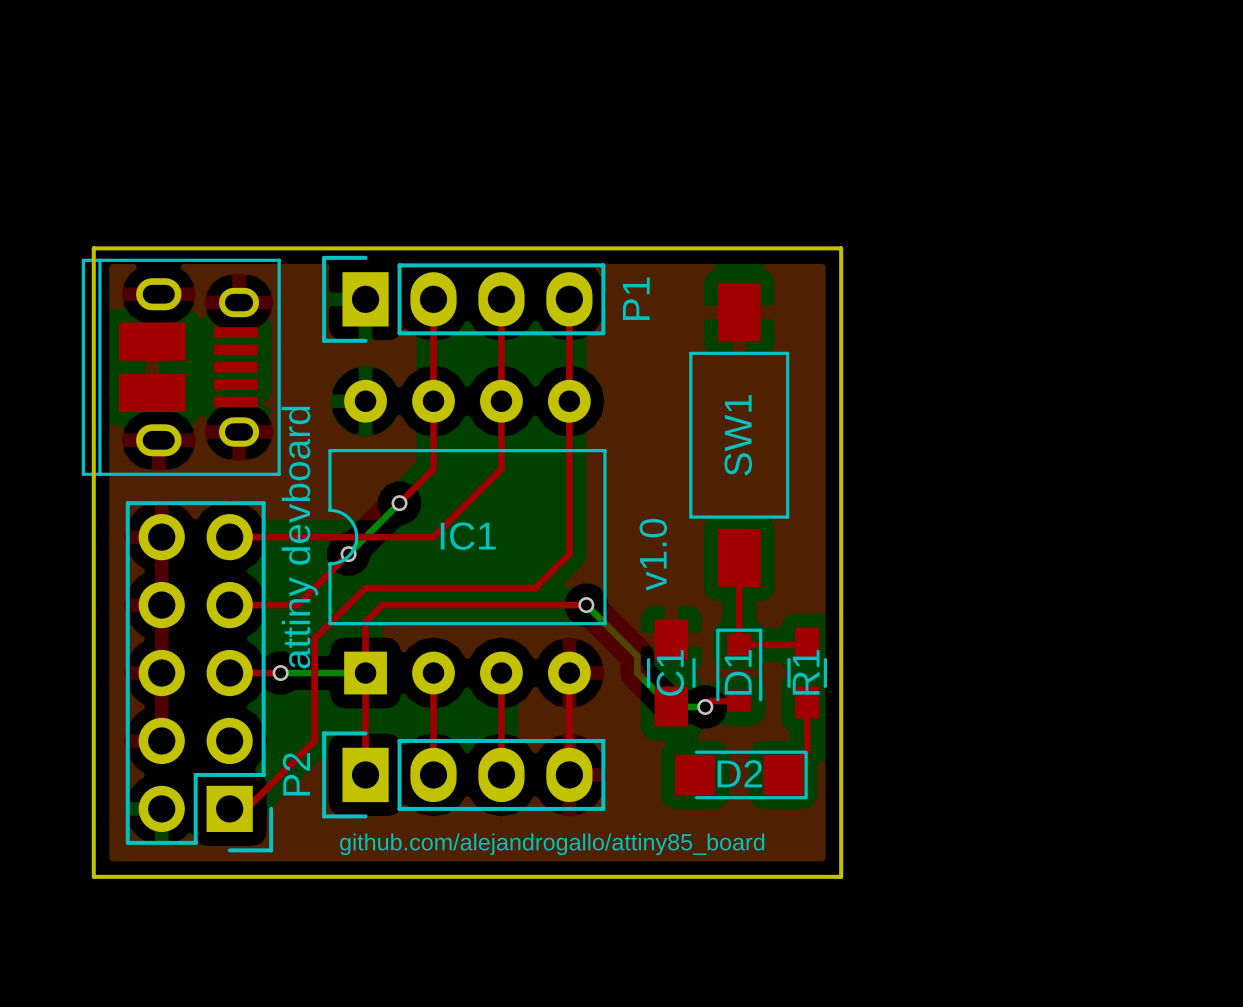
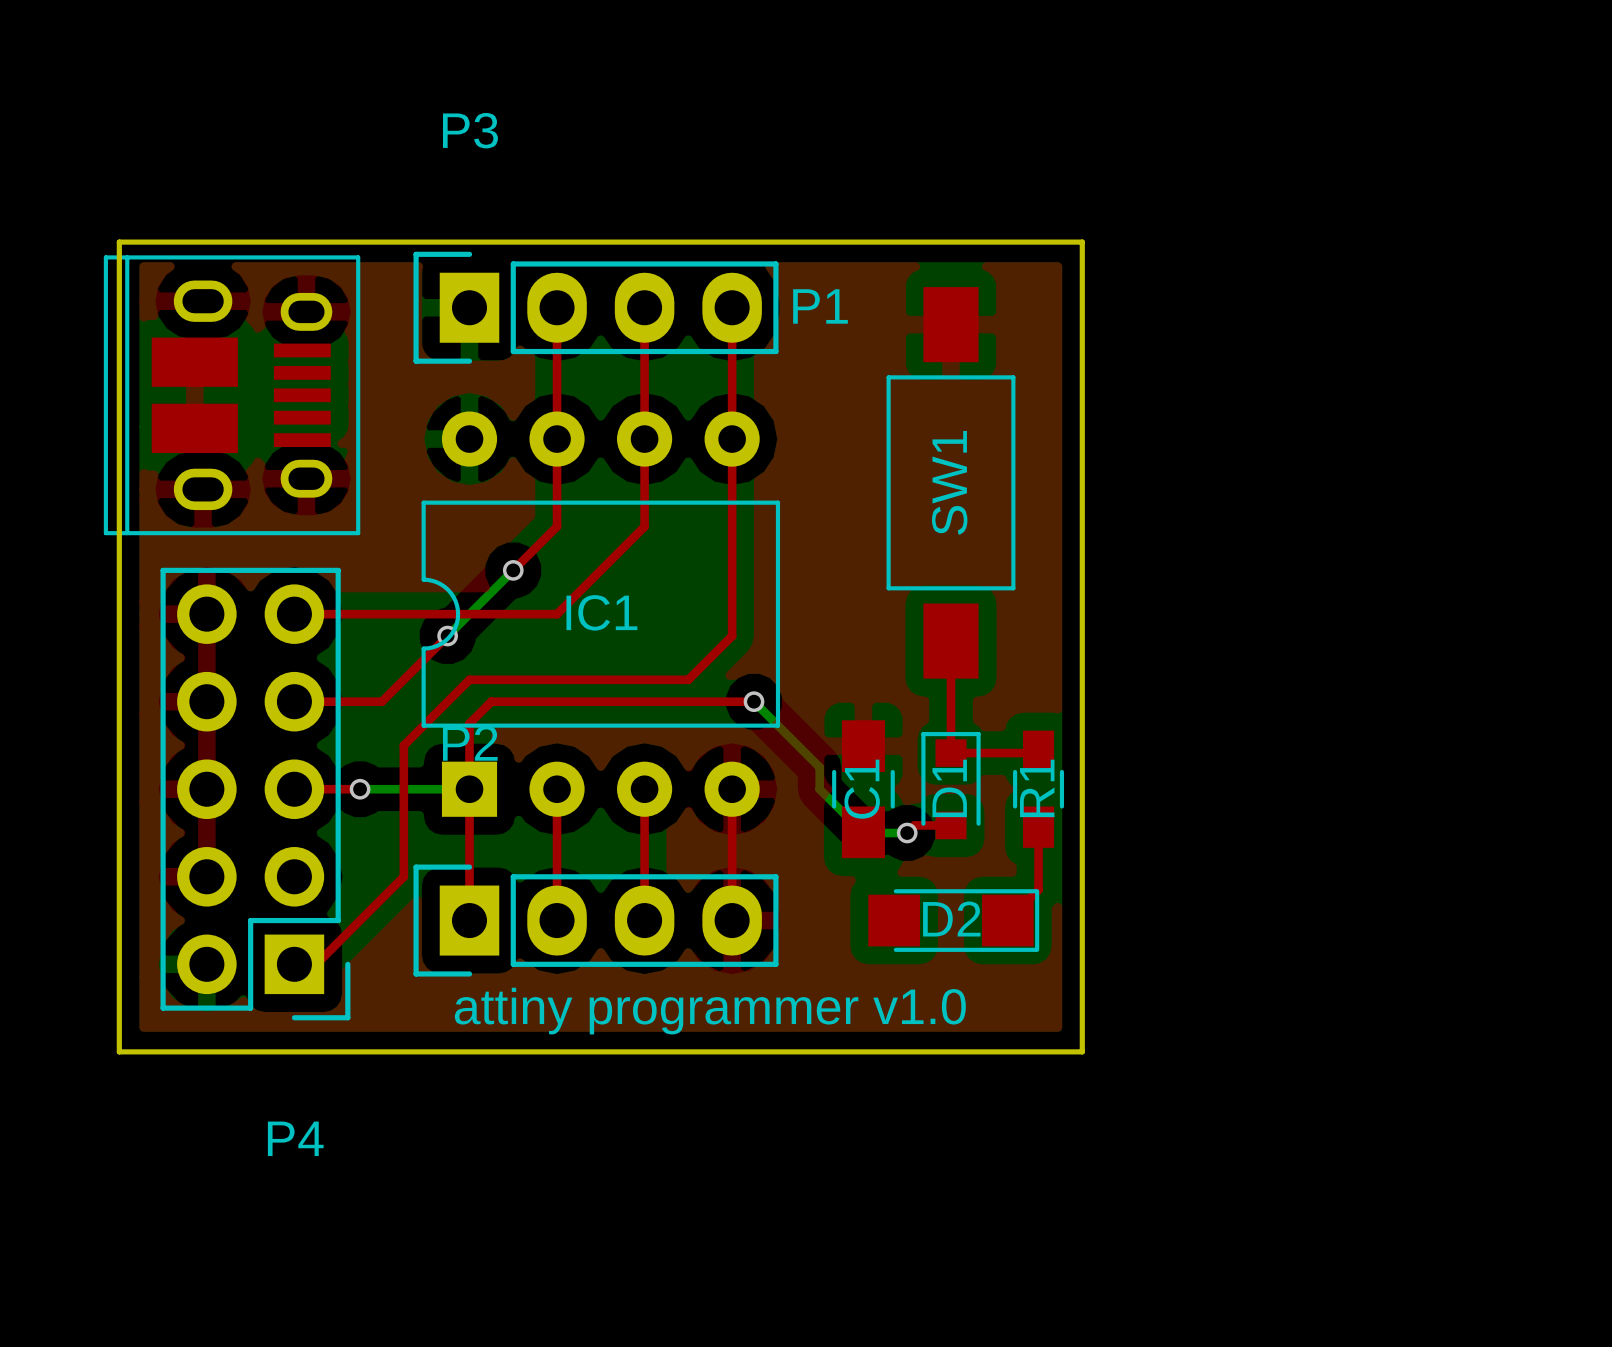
P3 name: none -> P3 (470, 130)
P1 name rotation: 0° (636, 298) -> 90° clockwise (820, 306)
text: attiny devboard (299, 537) -> none
text: v1.0 (653, 554) -> none
P2 name rotation: 0° (296, 774) -> 90° clockwise (470, 743)
P2 name position: P2 (296, 774) -> P2 (470, 743)
text: github.com/alejandrogallo/attiny85_board (552, 844) -> attiny programmer v1.0 (710, 1011)
P4 name: none -> P4 (295, 1138)

